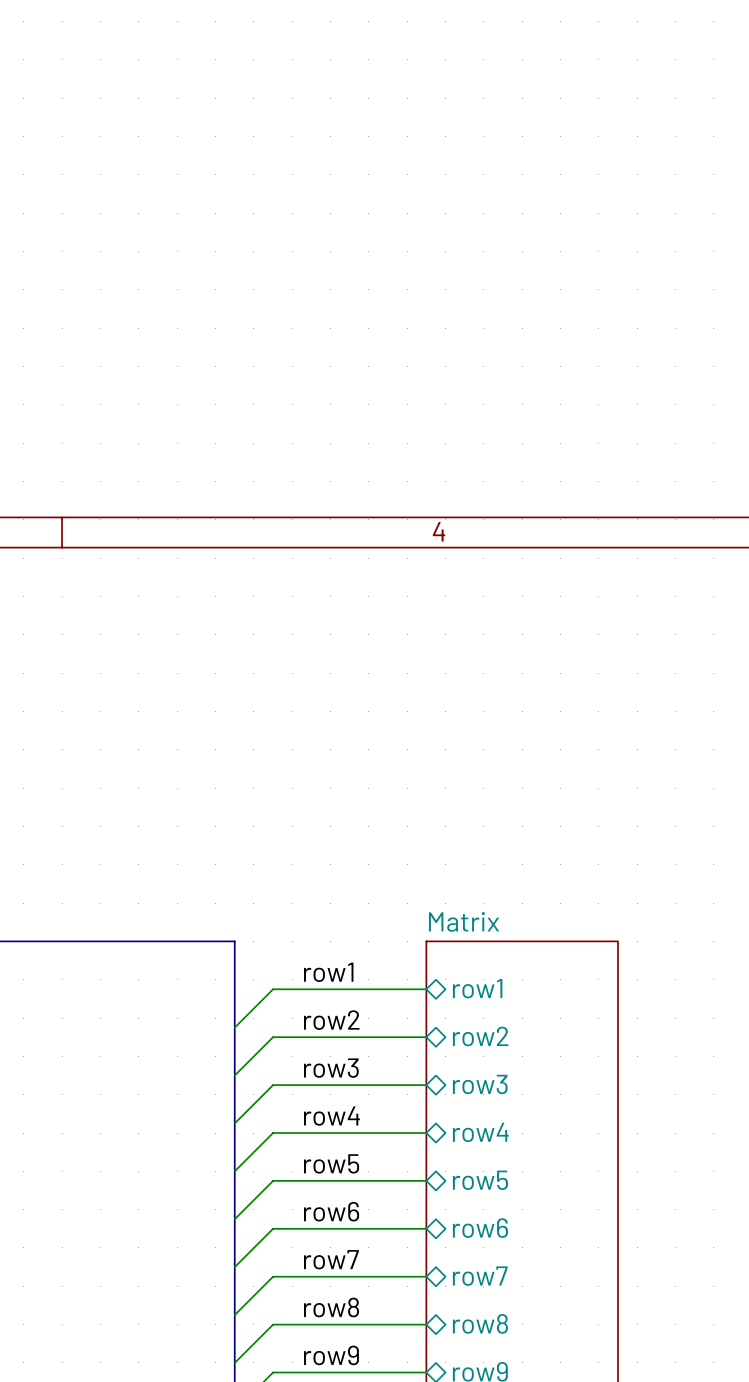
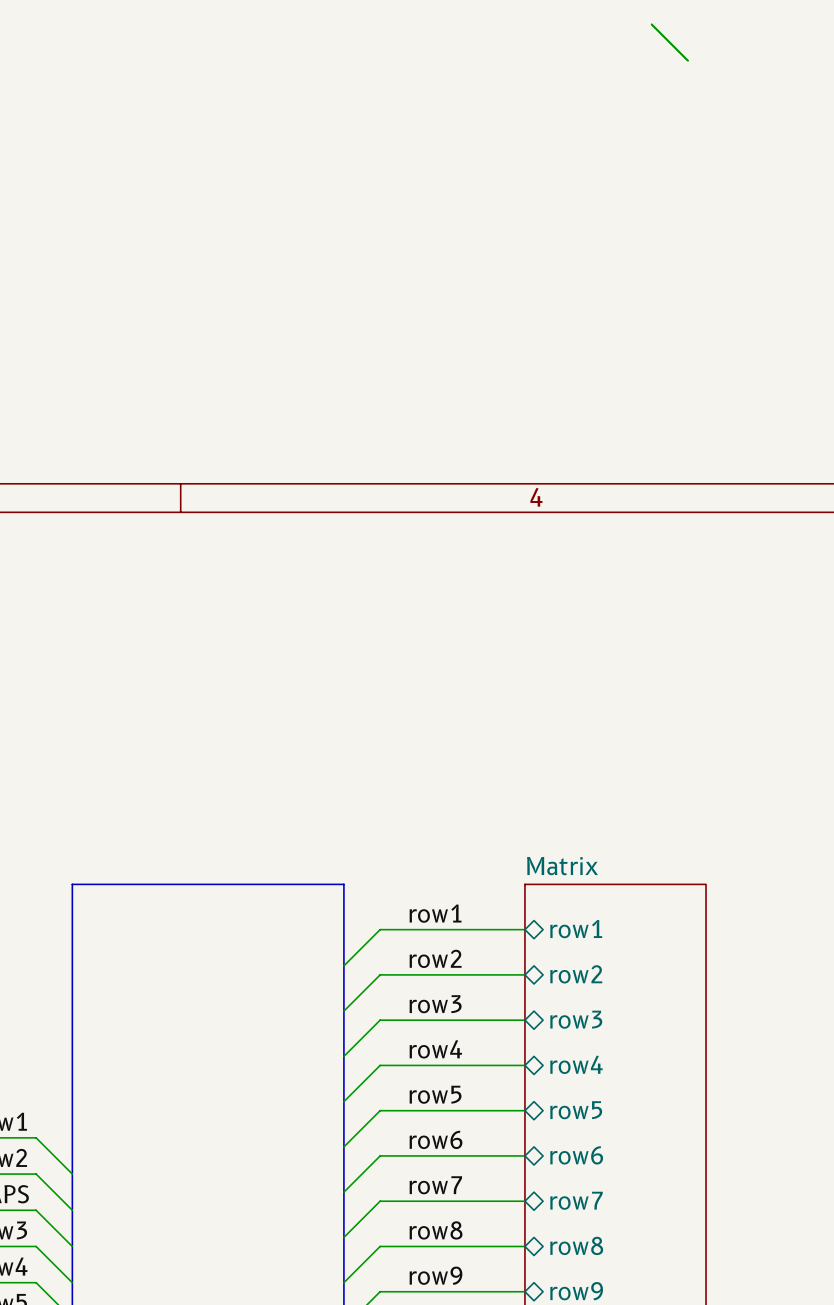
wire: none -> (651, 24) (687, 60)

